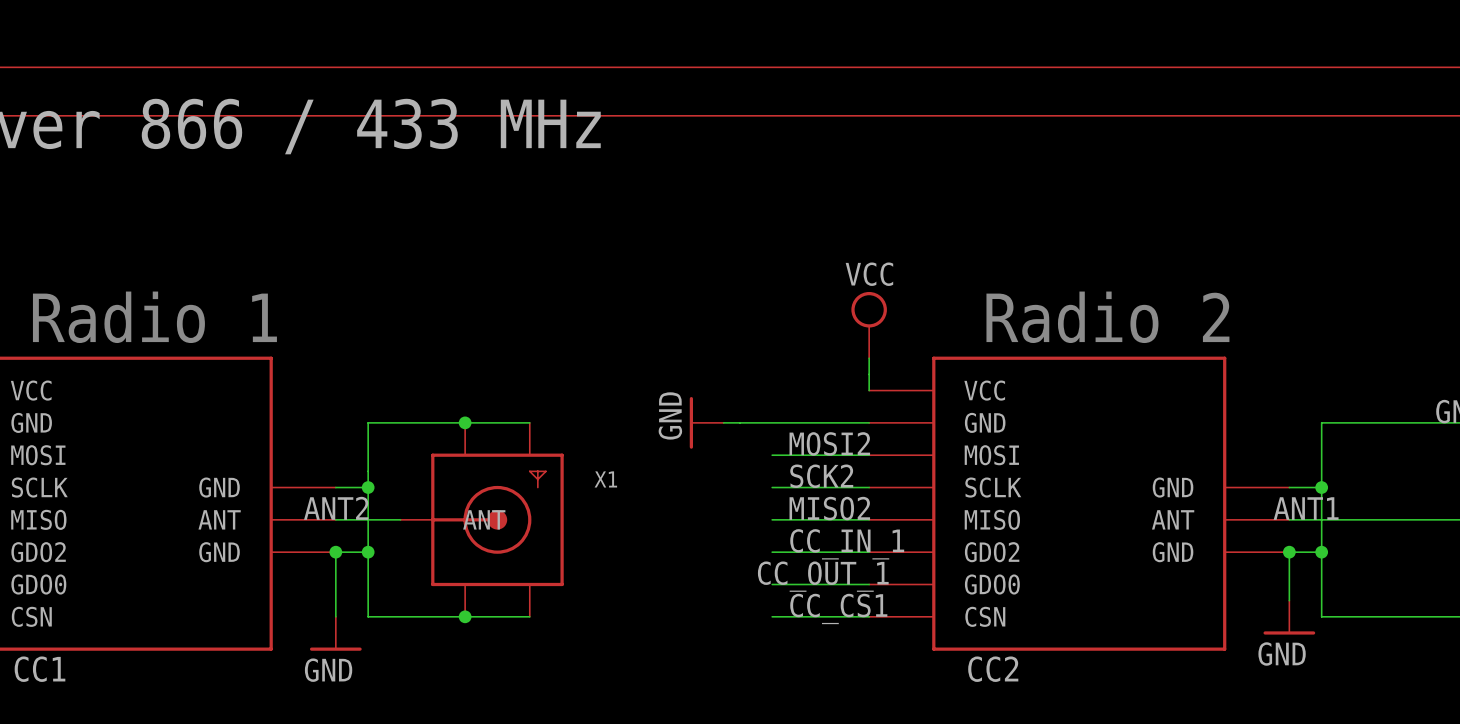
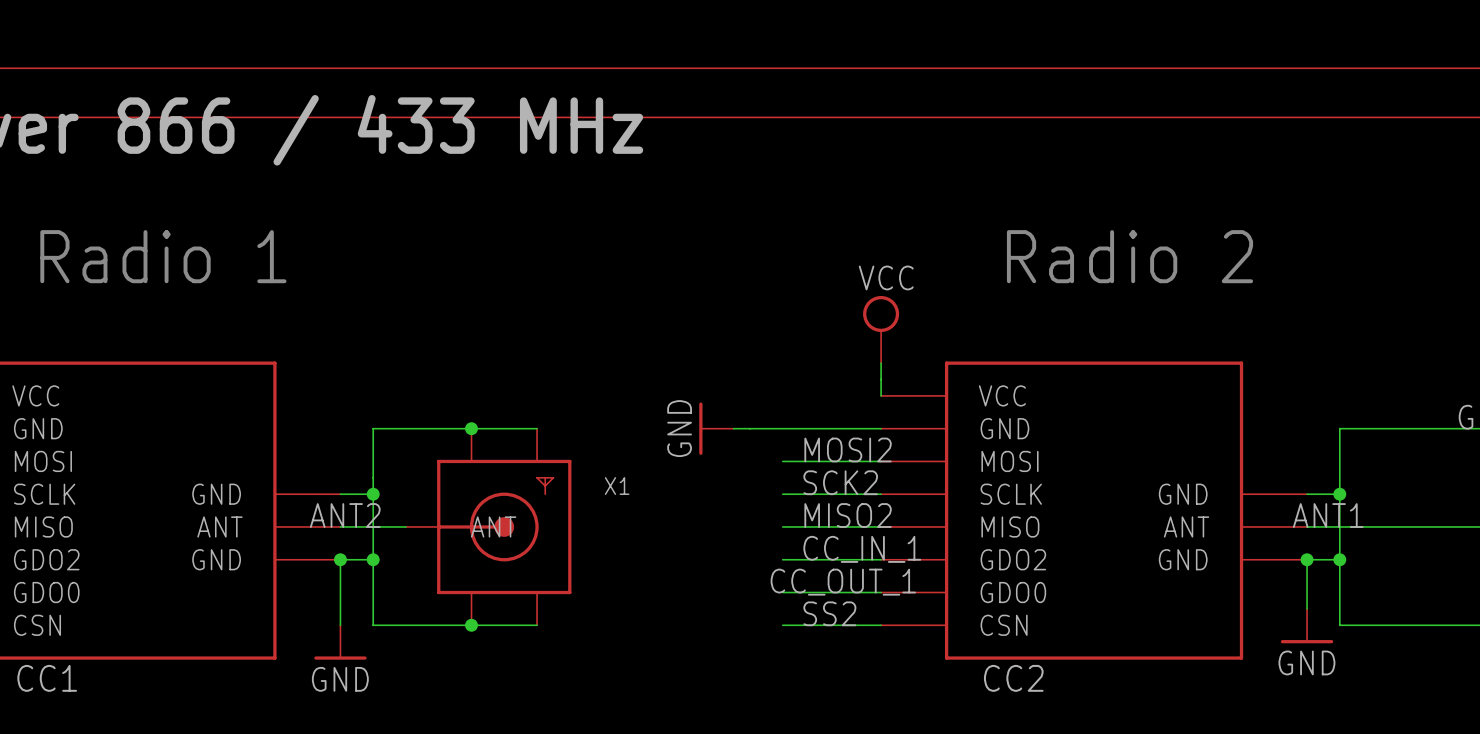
text position: Radio 1 (154, 317) -> Radio 1 (163, 256)
text position: Radio 2 (1107, 317) -> Radio 2 (1130, 256)
label: CC_CS1 (838, 608) -> SS2 (829, 613)

